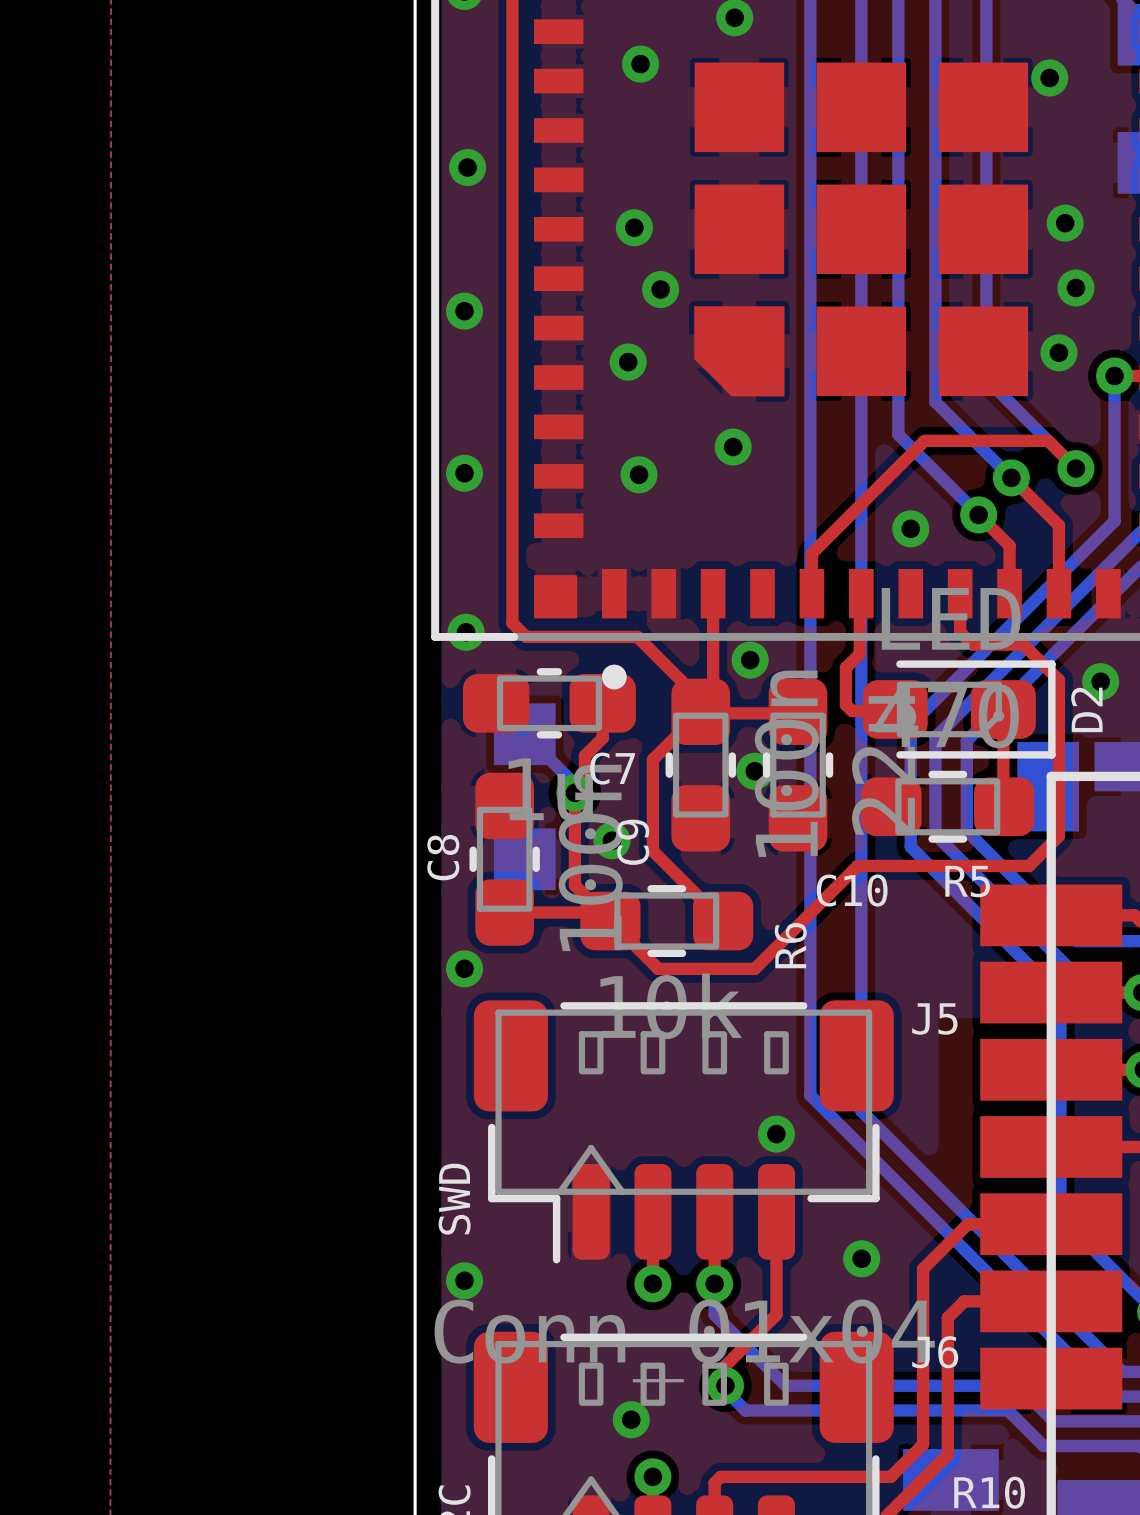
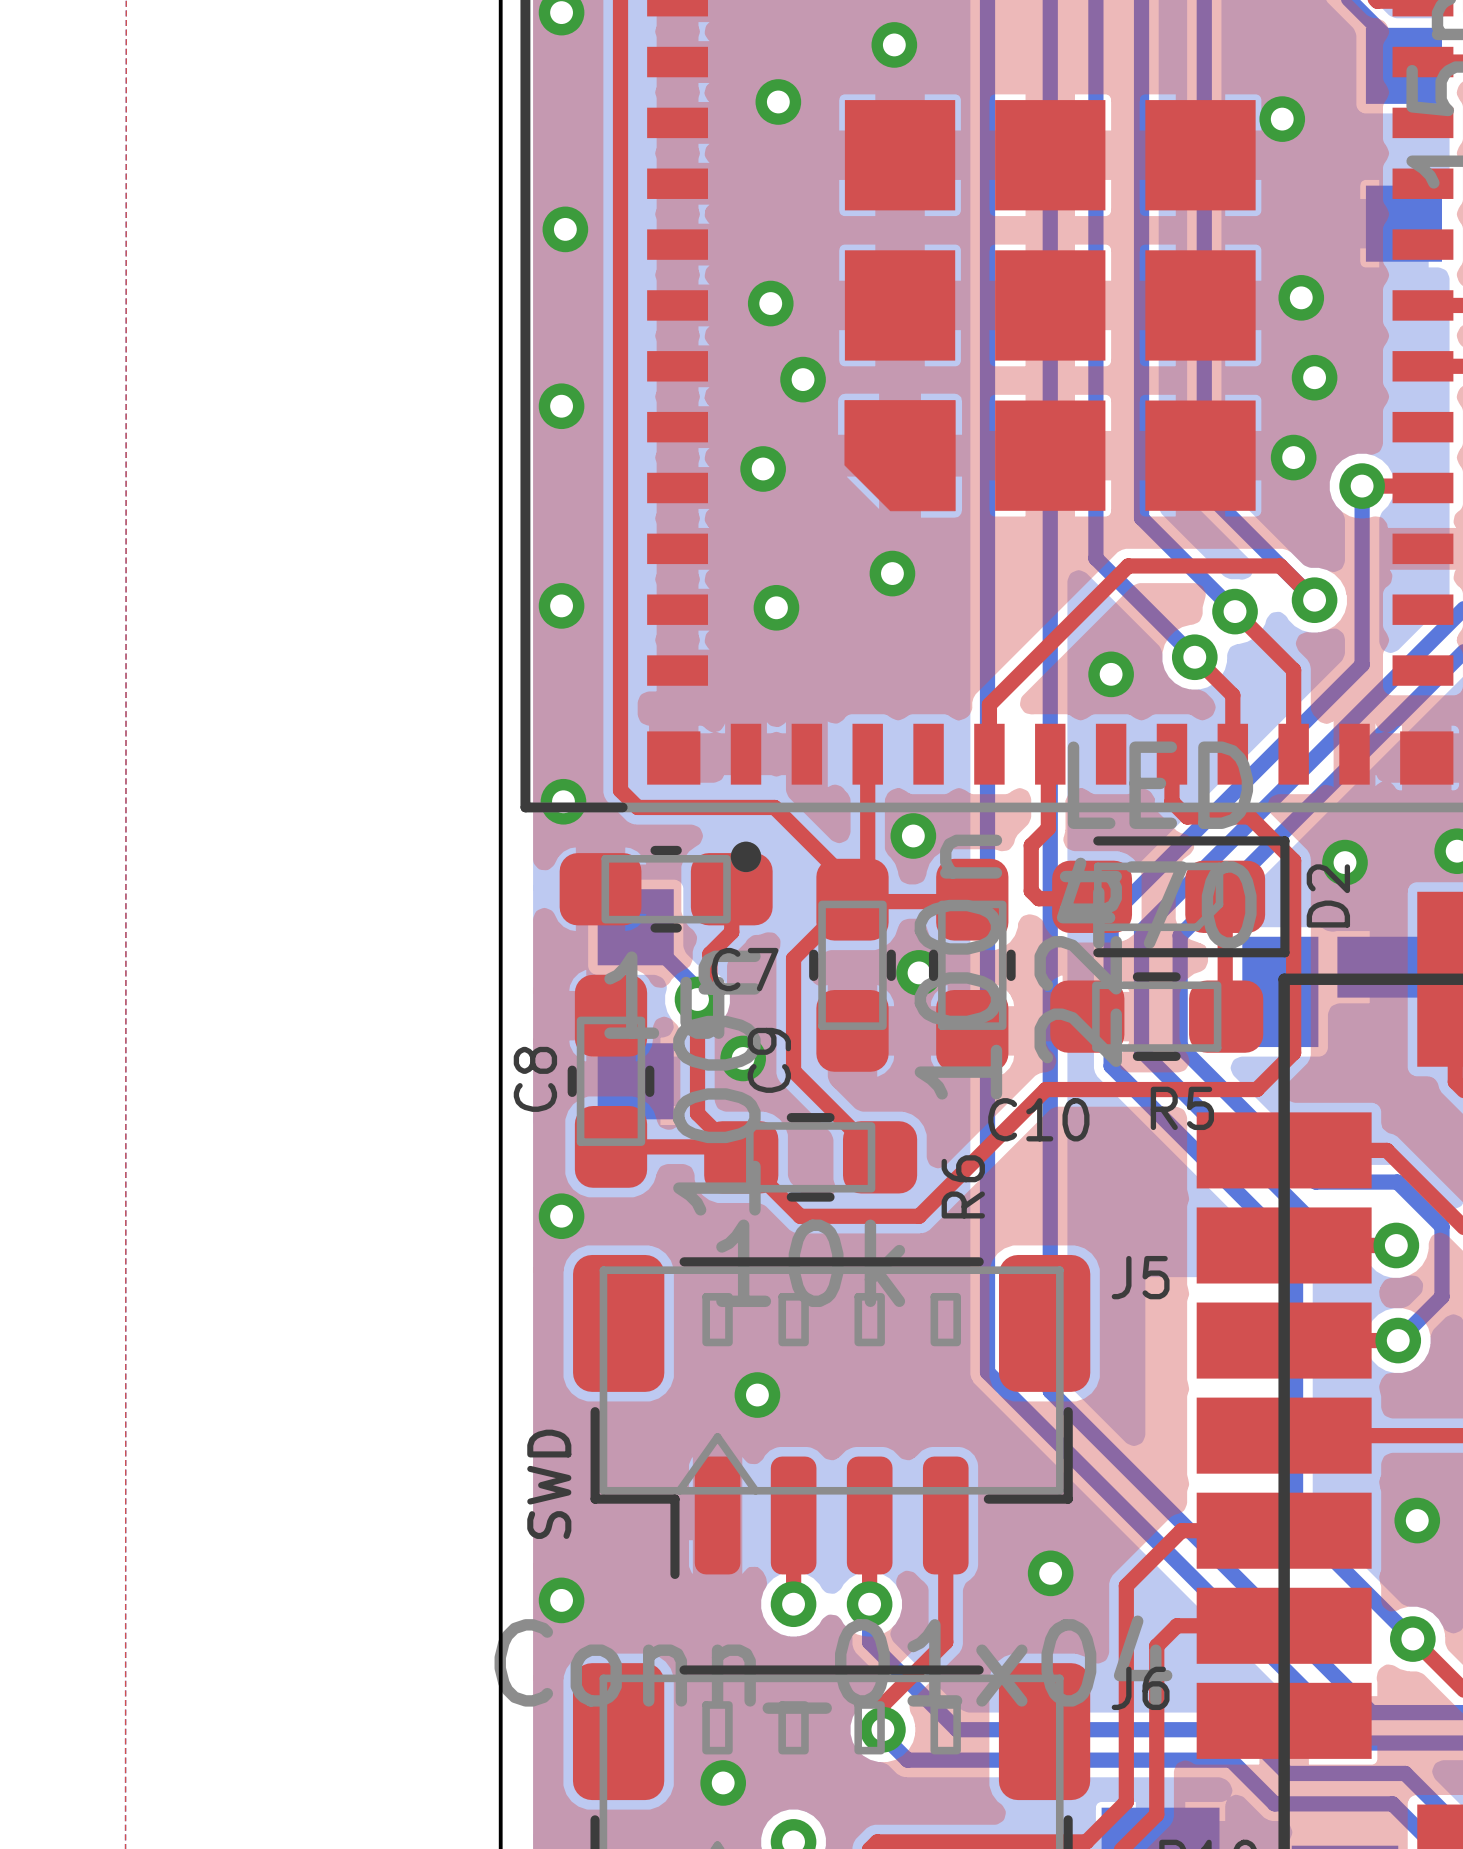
via: none -> (757, 1395)
via: (776, 1134) -> none
via position: (631, 1419) -> (723, 1782)

